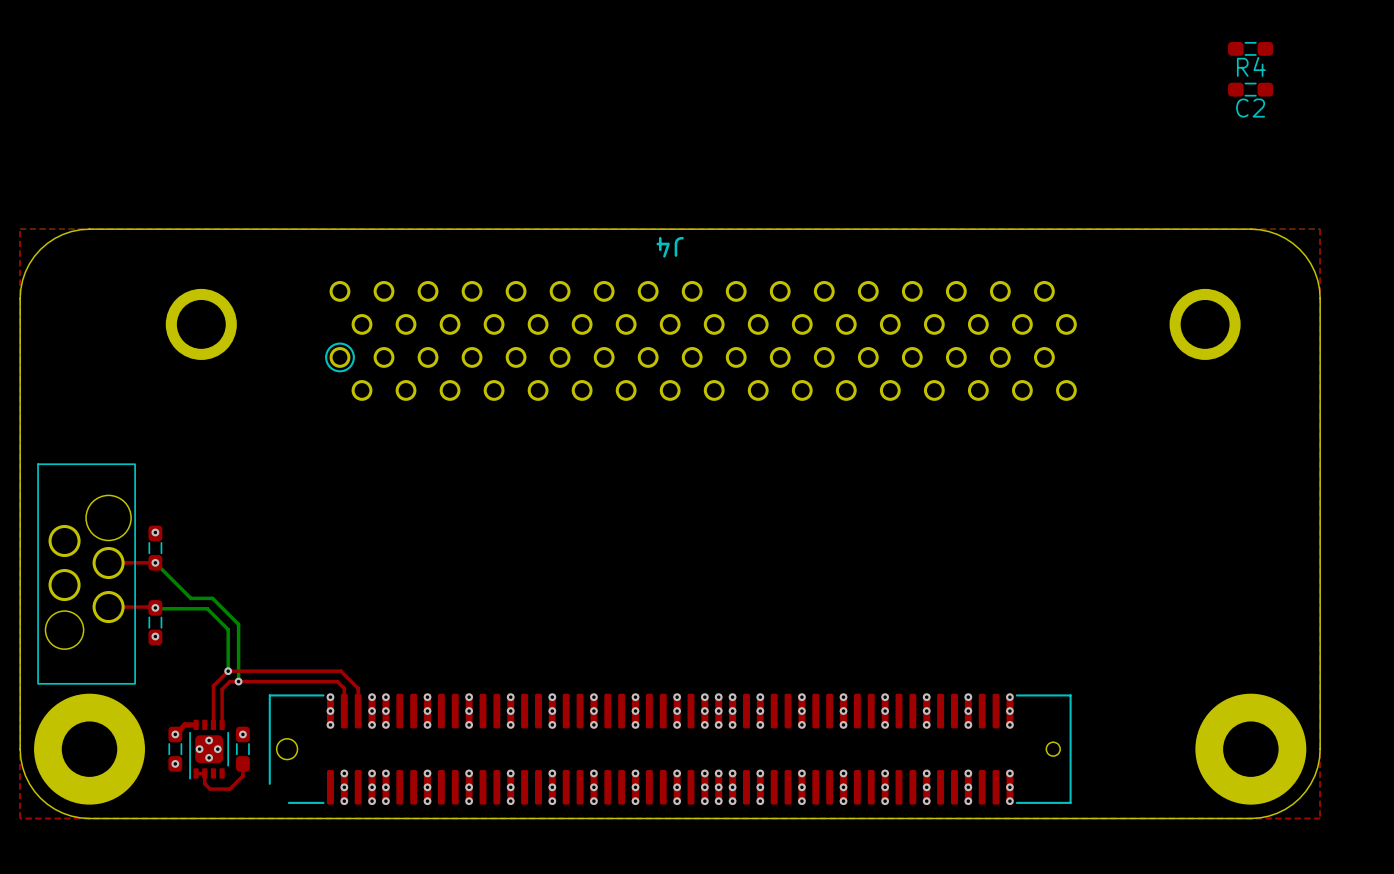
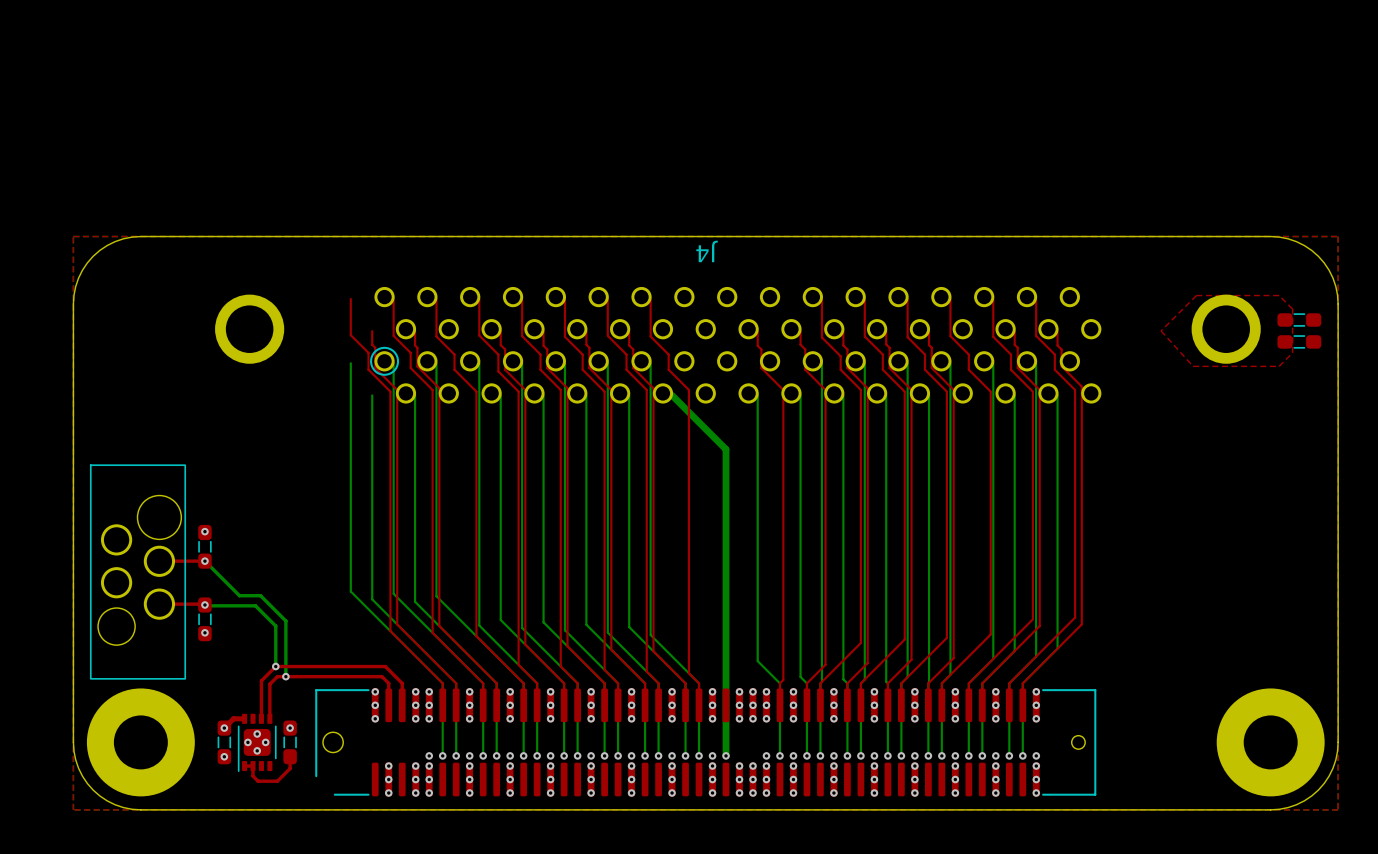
R4: (1250, 48) -> none
C2: (1250, 89) -> none
top zone outline: none -> (1196, 295) (1279, 295) (1292, 309) (1292, 352) (1279, 366) (1193, 366) (1161, 330) (1196, 295)
top track: none -> (350, 299) (350, 335) (368, 352) (368, 369) (390, 391) (390, 631) (442, 683) (442, 705)
top track: none -> (393, 299) (393, 335) (410, 352) (410, 368) (432, 389) (432, 632) (483, 683) (483, 705)
top track: none -> (436, 299) (436, 336) (454, 354) (454, 369) (476, 391) (476, 636) (523, 683) (523, 705)
top track: none -> (479, 299) (479, 335) (498, 354) (498, 371) (518, 391) (518, 664) (537, 683) (537, 705)
top track: none -> (522, 299) (522, 336) (540, 354) (540, 369) (560, 389) (560, 666) (577, 683) (577, 705)
top track: none -> (564, 299) (564, 336) (582, 354) (582, 369) (604, 391) (604, 669) (618, 683) (618, 705)
top track: none -> (607, 299) (607, 335) (626, 354) (626, 369) (646, 389) (646, 671) (658, 683) (658, 705)
top track: none -> (650, 299) (650, 336) (668, 354) (668, 369) (688, 389) (688, 673) (699, 683) (699, 705)
top track: none -> (821, 299) (821, 337) (840, 356) (840, 369) (860, 389) (860, 642) (820, 683) (820, 705)
top track: none -> (864, 299) (864, 336) (882, 354) (882, 369) (904, 391) (904, 639) (860, 683) (860, 705)
top track: none -> (907, 299) (907, 337) (925, 354) (925, 369) (946, 391) (946, 637) (901, 683) (901, 705)
top track: none -> (950, 299) (950, 336) (968, 354) (968, 369) (990, 391) (990, 634) (941, 683) (941, 705)
top track: none -> (993, 299) (993, 336) (1011, 354) (1011, 369) (1032, 391) (1032, 619) (968, 683) (968, 705)
top track: none -> (1036, 299) (1036, 335) (1054, 354) (1054, 369) (1075, 389) (1075, 617) (1009, 683) (1009, 705)
part: none -> (1299, 320)
top track: none -> (372, 331) (372, 344) (375, 347) (375, 368) (397, 389) (397, 624) (456, 683) (456, 705)
top track: none -> (415, 331) (417, 366) (439, 388) (439, 626) (496, 683) (496, 705)
top track: none -> (500, 331) (500, 345) (505, 349) (505, 369) (525, 389) (525, 644) (564, 683) (564, 705)
top track: none -> (543, 331) (543, 345) (547, 349) (547, 368) (567, 388) (567, 646) (604, 683) (604, 705)
top track: none -> (586, 331) (586, 344) (589, 347) (589, 368) (611, 389) (611, 649) (645, 683) (645, 705)
top track: none -> (629, 331) (629, 345) (633, 349) (633, 368) (653, 388) (653, 651) (685, 683) (685, 705)
top track: none -> (757, 331) (757, 345) (761, 349) (761, 368) (783, 389) (783, 680) (779, 683) (779, 705)
top track: none -> (800, 331) (800, 344) (805, 349) (805, 369) (825, 389) (825, 664) (806, 683) (806, 705)
top track: none -> (843, 331) (843, 345) (847, 349) (847, 368) (867, 388) (867, 663) (847, 683) (847, 705)
top track: none -> (886, 331) (886, 344) (889, 347) (889, 368) (911, 389) (911, 659) (887, 683) (887, 705)
top track: none -> (929, 331) (931, 368) (953, 389) (953, 658) (928, 683) (928, 705)
top track: none -> (1014, 331) (1014, 344) (1017, 347) (1017, 368) (1039, 389) (1039, 626) (982, 683) (982, 705)
top track: none -> (1057, 331) (1057, 345) (1061, 349) (1061, 366) (1081, 386) (1081, 624) (1022, 683) (1022, 705)
part: none -> (1299, 341)
bottom track: none -> (350, 363) (350, 591) (442, 683) (442, 755)
bottom track: none -> (393, 363) (393, 593) (483, 683) (483, 755)
bottom track: none -> (436, 363) (436, 596) (523, 683) (523, 755)
bottom track: none -> (479, 363) (479, 625) (537, 683) (537, 755)
bottom track: none -> (522, 363) (522, 627) (577, 683) (577, 755)
bottom track: none -> (564, 363) (564, 630) (618, 683) (618, 755)
bottom track: none -> (607, 363) (607, 632) (658, 683) (658, 755)
bottom track: none -> (650, 363) (650, 635) (699, 683) (699, 755)
bottom track: none -> (821, 363) (820, 755)
bottom track: none -> (864, 363) (864, 679) (860, 683) (860, 755)
bottom track: none -> (907, 363) (907, 677) (901, 683) (901, 755)
bottom track: none -> (950, 363) (950, 674) (941, 683) (941, 755)
bottom track: none -> (993, 363) (993, 658) (968, 683) (968, 755)
bottom track: none -> (1036, 363) (1036, 656) (1009, 683) (1009, 755)
bottom track: none -> (372, 395) (372, 599) (456, 683) (456, 755)
bottom track: none -> (415, 395) (415, 601) (496, 683) (496, 755)
bottom track: none -> (500, 395) (500, 619) (564, 683) (564, 755)
bottom track: none -> (543, 395) (543, 622) (604, 683) (604, 755)
bottom track: none -> (586, 395) (586, 624) (645, 683) (645, 755)
bottom track: none -> (629, 395) (629, 627) (685, 683) (685, 755)
bottom track: none -> (672, 395) (726, 449) (726, 755)
bottom track: none -> (757, 395) (757, 661) (779, 683) (779, 755)
bottom track: none -> (800, 395) (800, 676) (806, 683) (806, 755)
bottom track: none -> (843, 395) (843, 679) (847, 683) (847, 755)
bottom track: none -> (886, 395) (887, 755)
bottom track: none -> (929, 395) (928, 755)
bottom track: none -> (1014, 395) (1014, 651) (982, 683) (982, 755)
bottom track: none -> (1057, 395) (1057, 648) (1022, 683) (1022, 755)
via: none -> (429, 755)
via: none -> (442, 755)
via: none -> (456, 755)
via: none -> (469, 755)
via: none -> (483, 755)
via: none -> (496, 755)
via: none -> (510, 755)
via: none -> (523, 755)
via: none -> (537, 755)
via: none -> (550, 755)
via: none -> (564, 755)
via: none -> (577, 755)
via: none -> (591, 755)
via: none -> (604, 755)
via: none -> (618, 755)
via: none -> (631, 755)
via: none -> (645, 755)
via: none -> (658, 755)
via: none -> (672, 755)
via: none -> (685, 755)
via: none -> (699, 755)
via: none -> (712, 755)
via: none -> (726, 755)
via: none -> (766, 755)
via: none -> (779, 755)
via: none -> (793, 755)
via: none -> (806, 755)
via: none -> (820, 755)
via: none -> (833, 755)
via: none -> (847, 755)
via: none -> (860, 755)
via: none -> (874, 755)
via: none -> (887, 755)
via: none -> (901, 755)
via: none -> (914, 755)
via: none -> (928, 755)
via: none -> (941, 755)
via: none -> (955, 755)
via: none -> (968, 755)
via: none -> (982, 755)
via: none -> (995, 755)
via: none -> (1009, 755)
via: none -> (1022, 755)
via: none -> (1036, 755)

